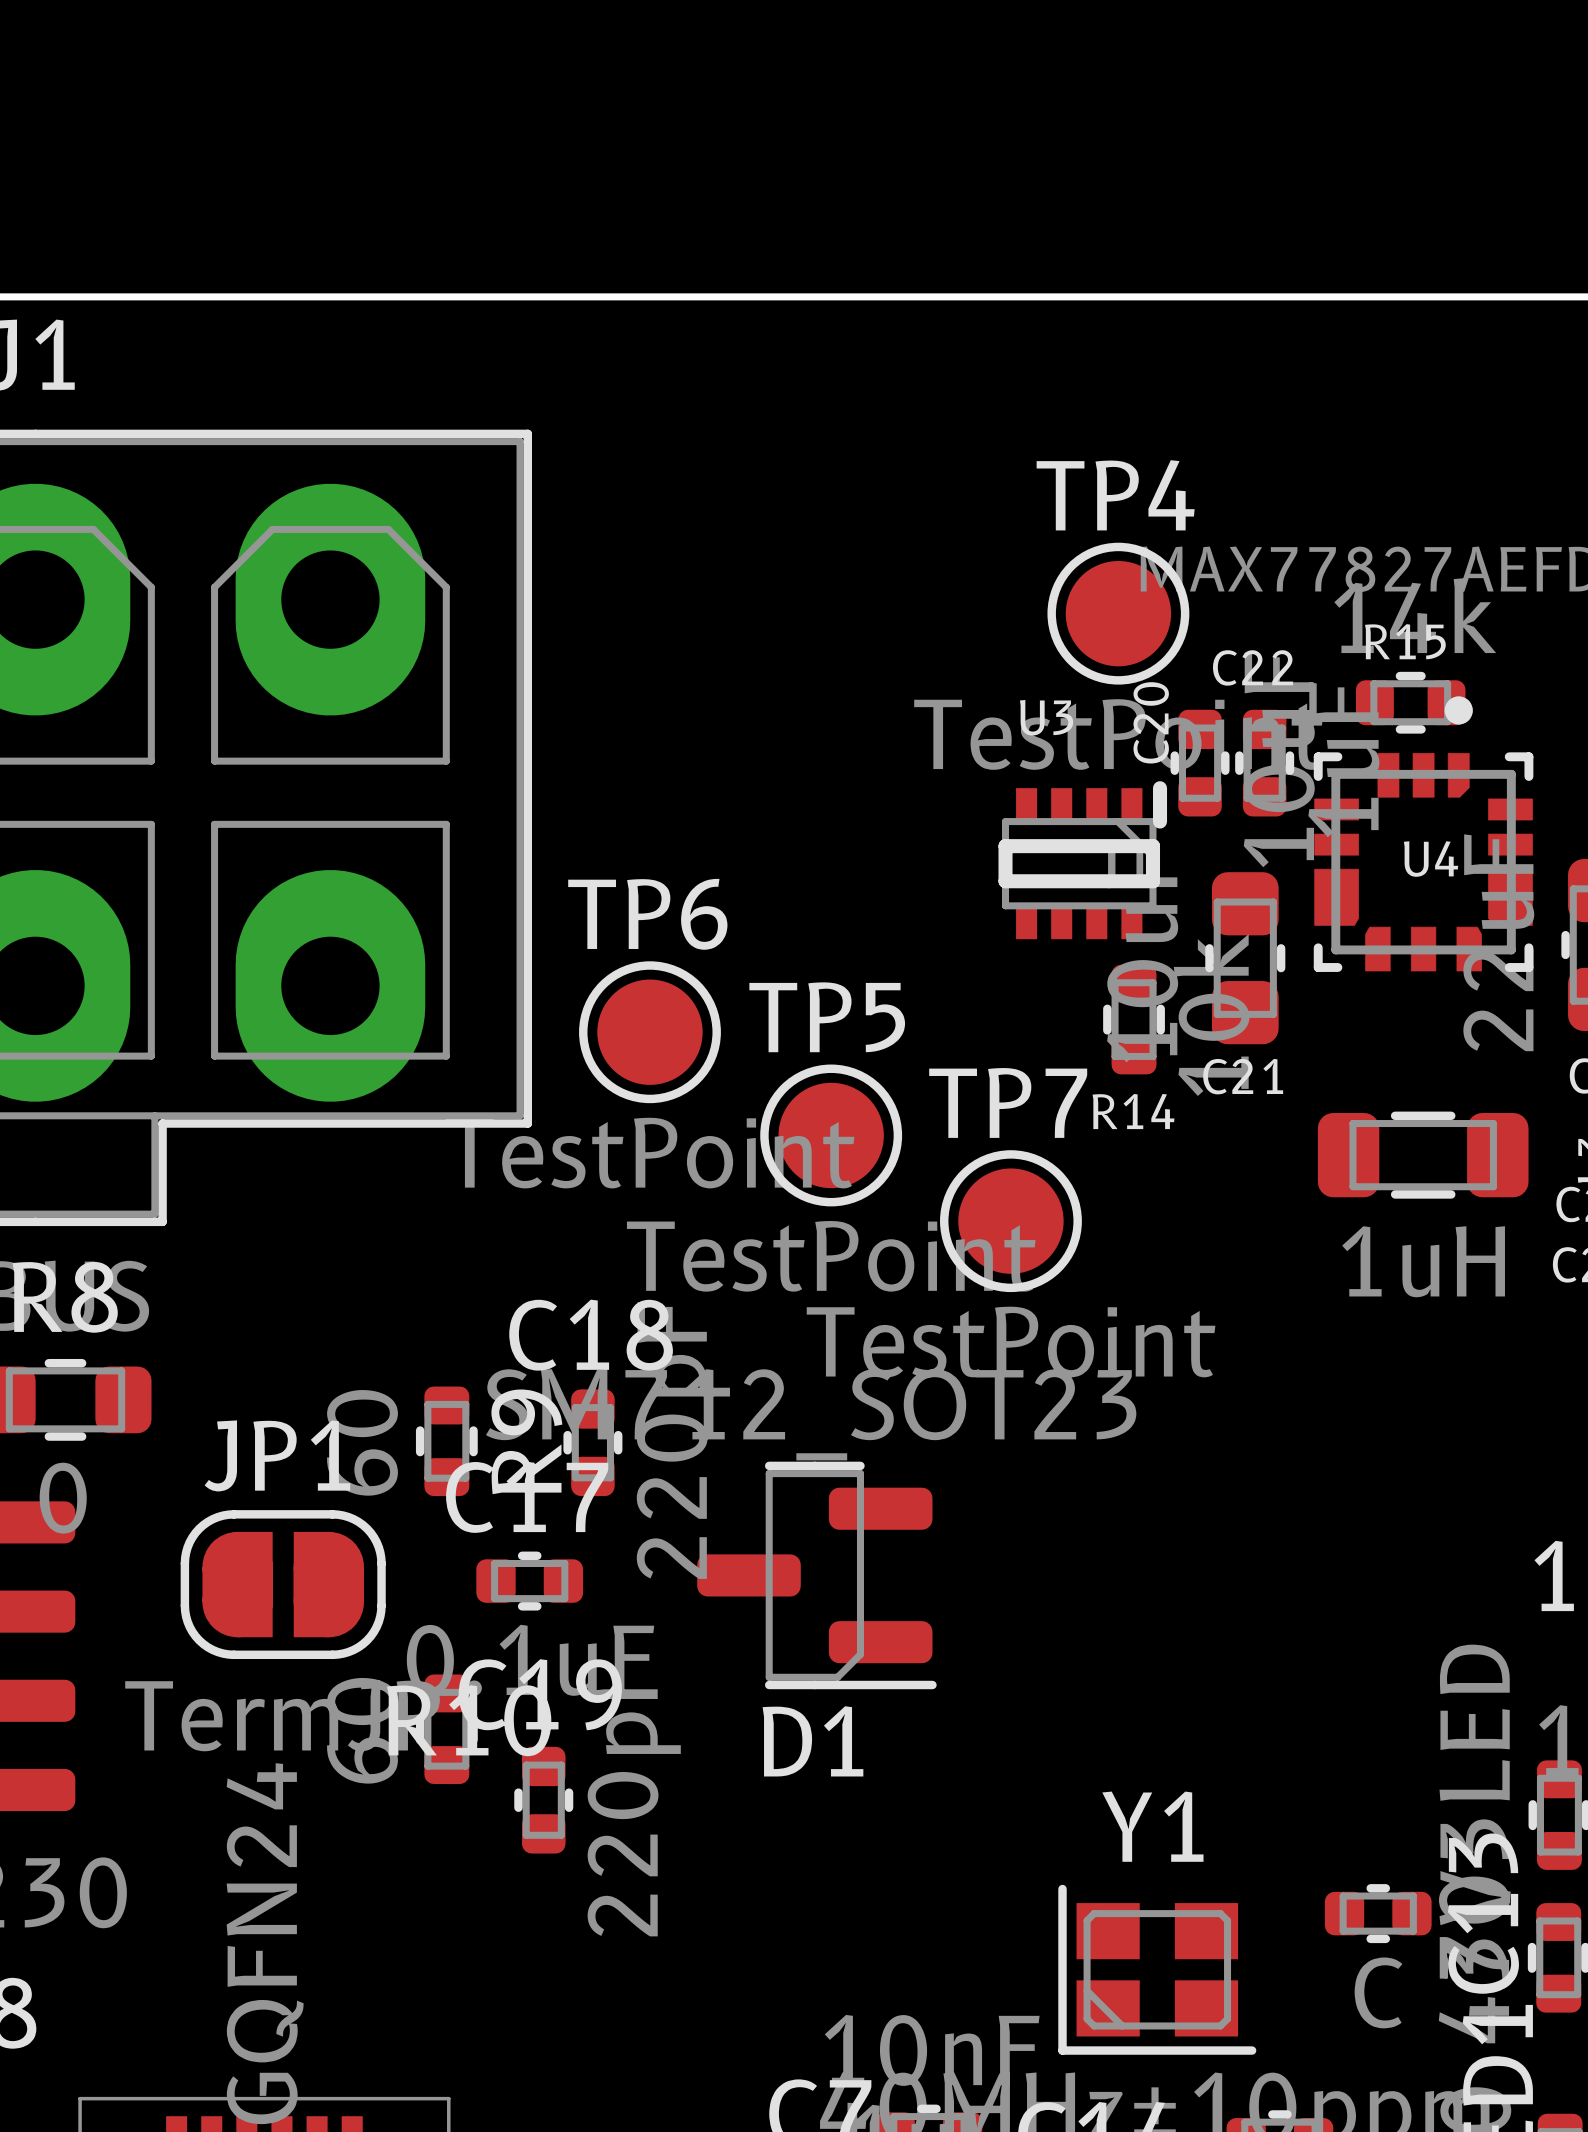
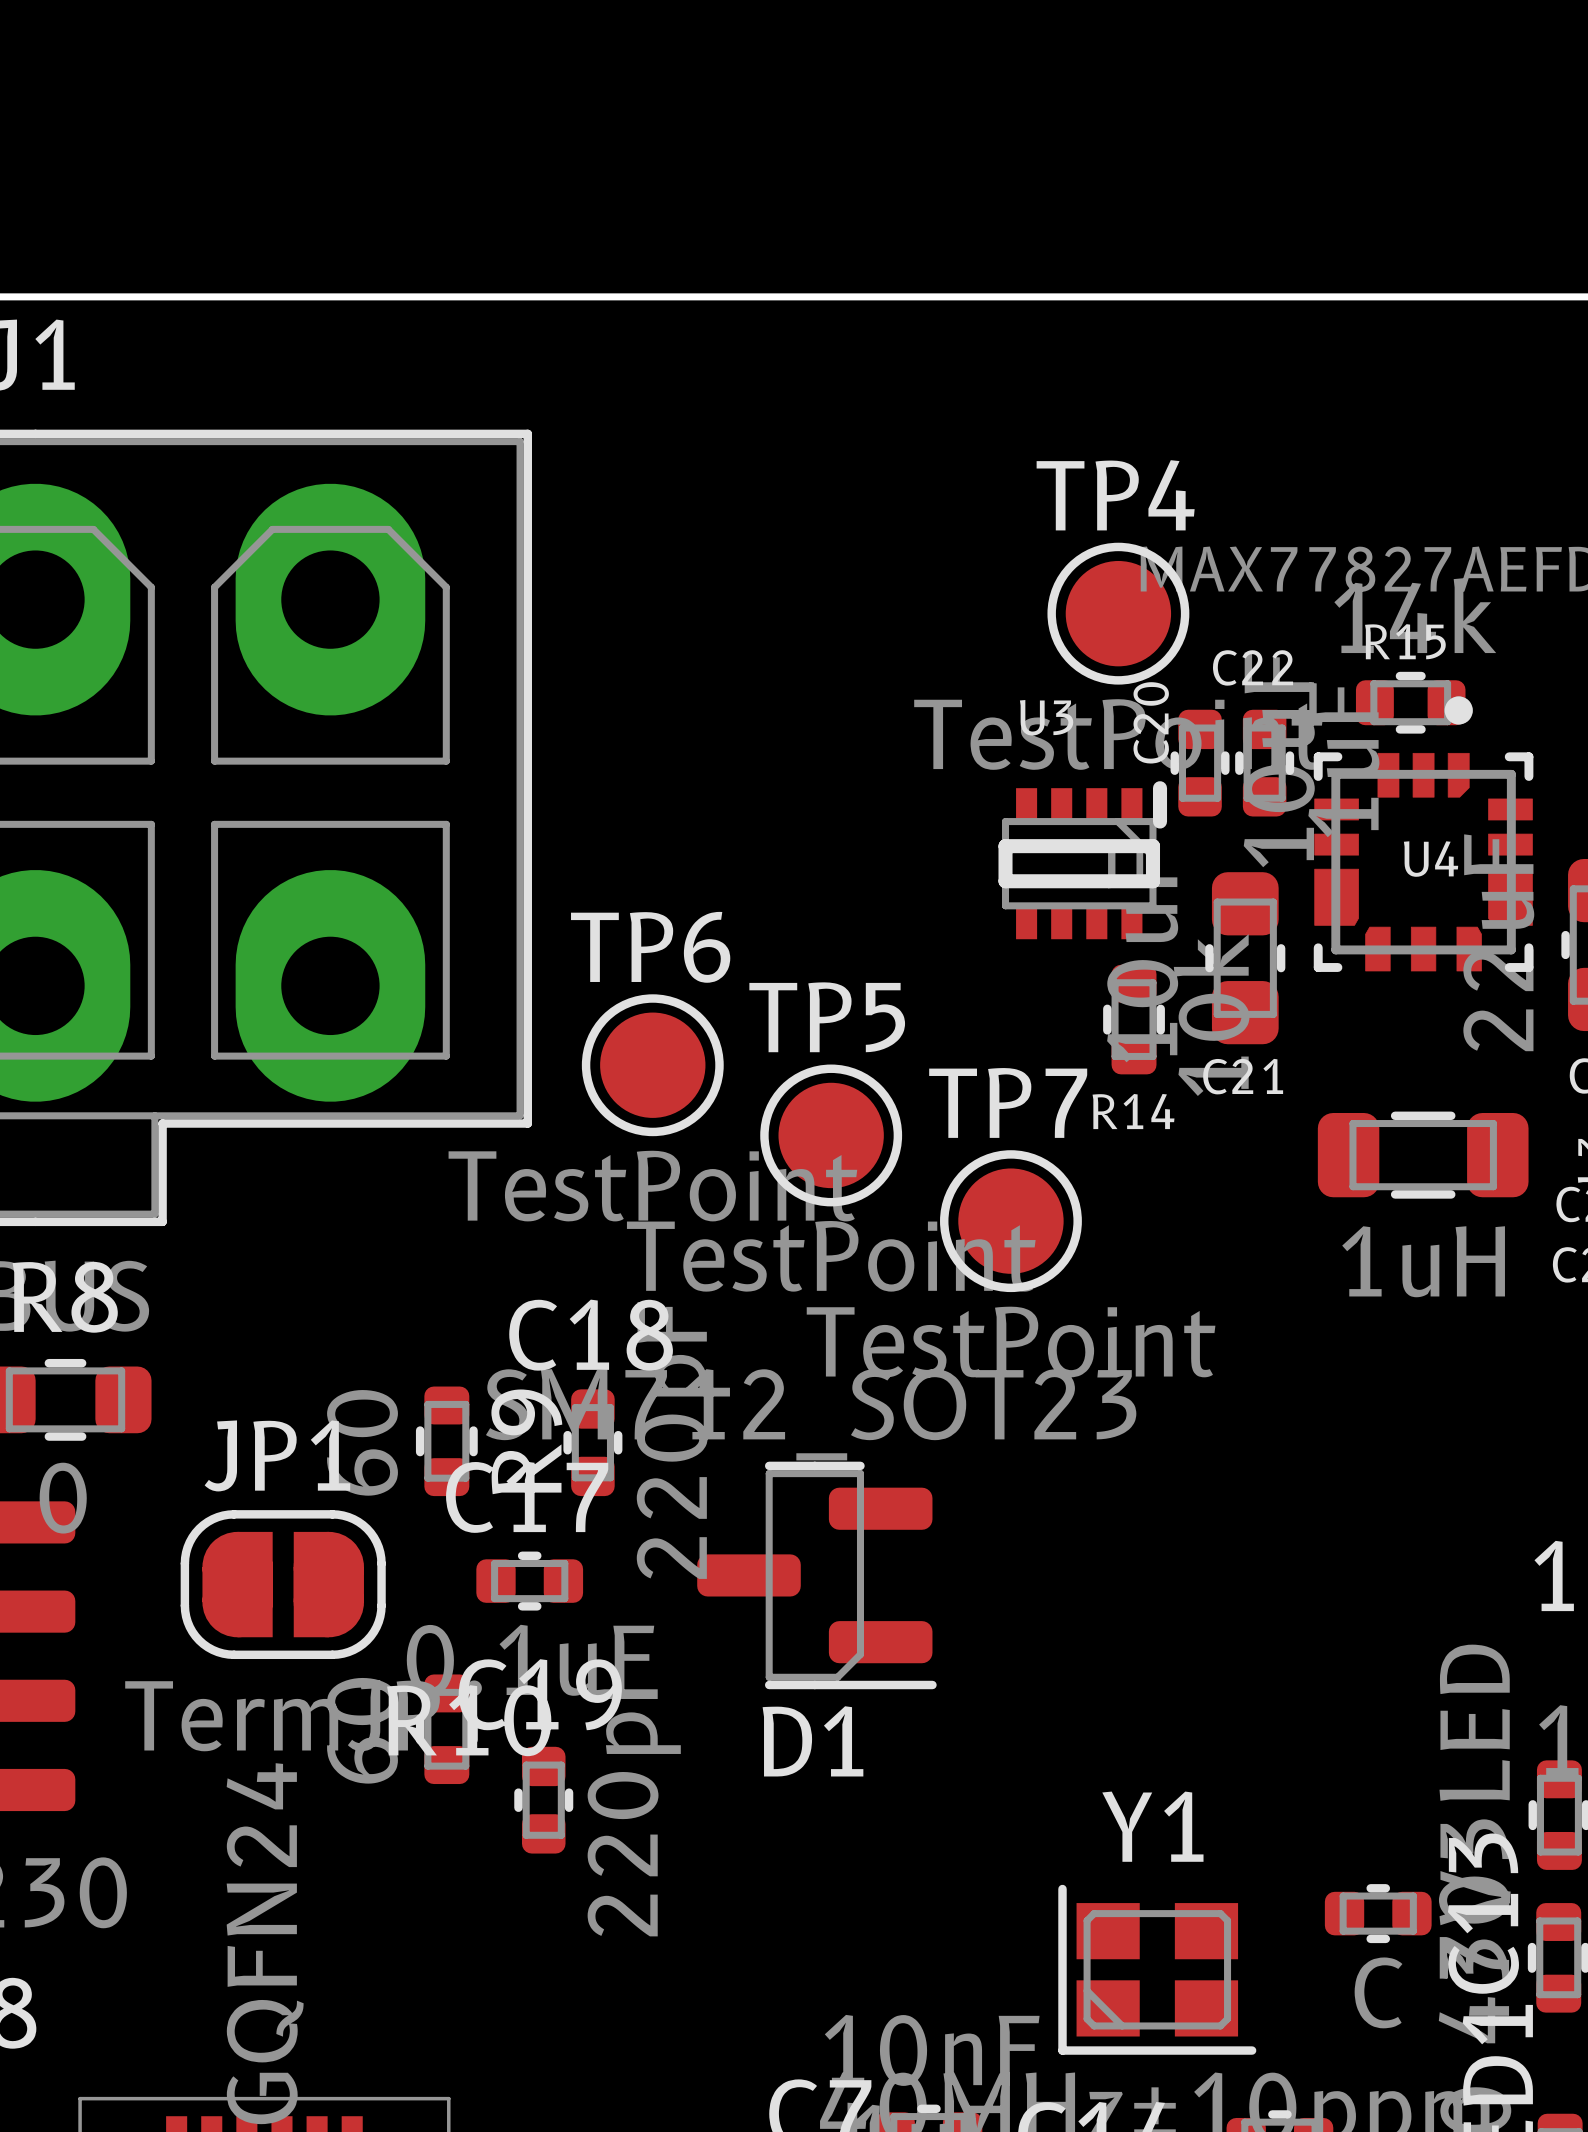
TP6 position: (649, 1032) -> (652, 1065)

